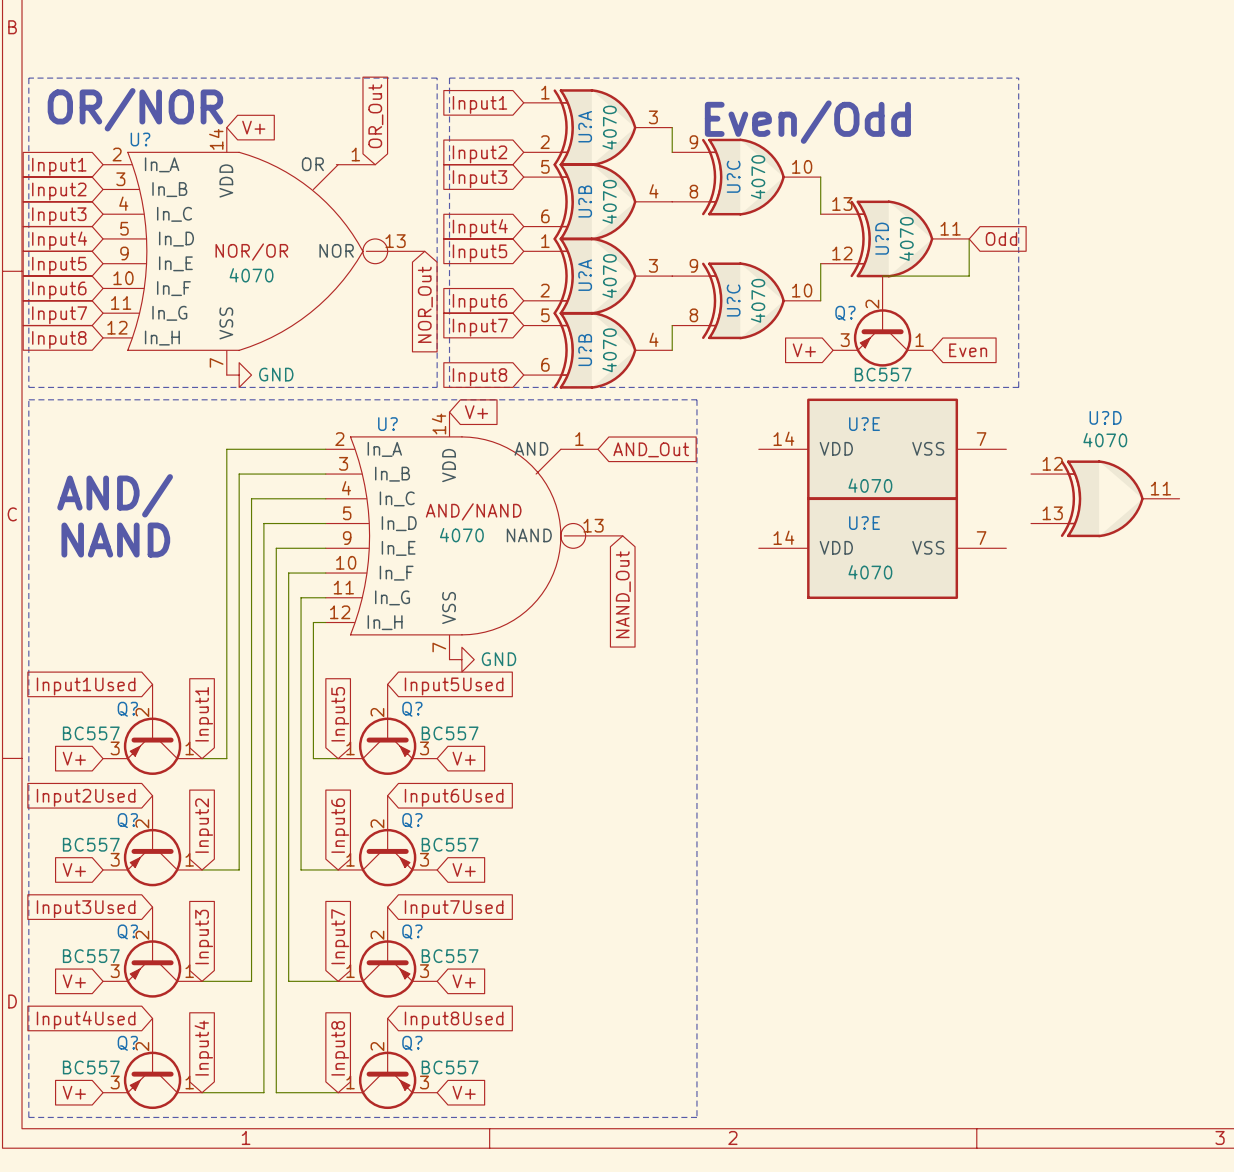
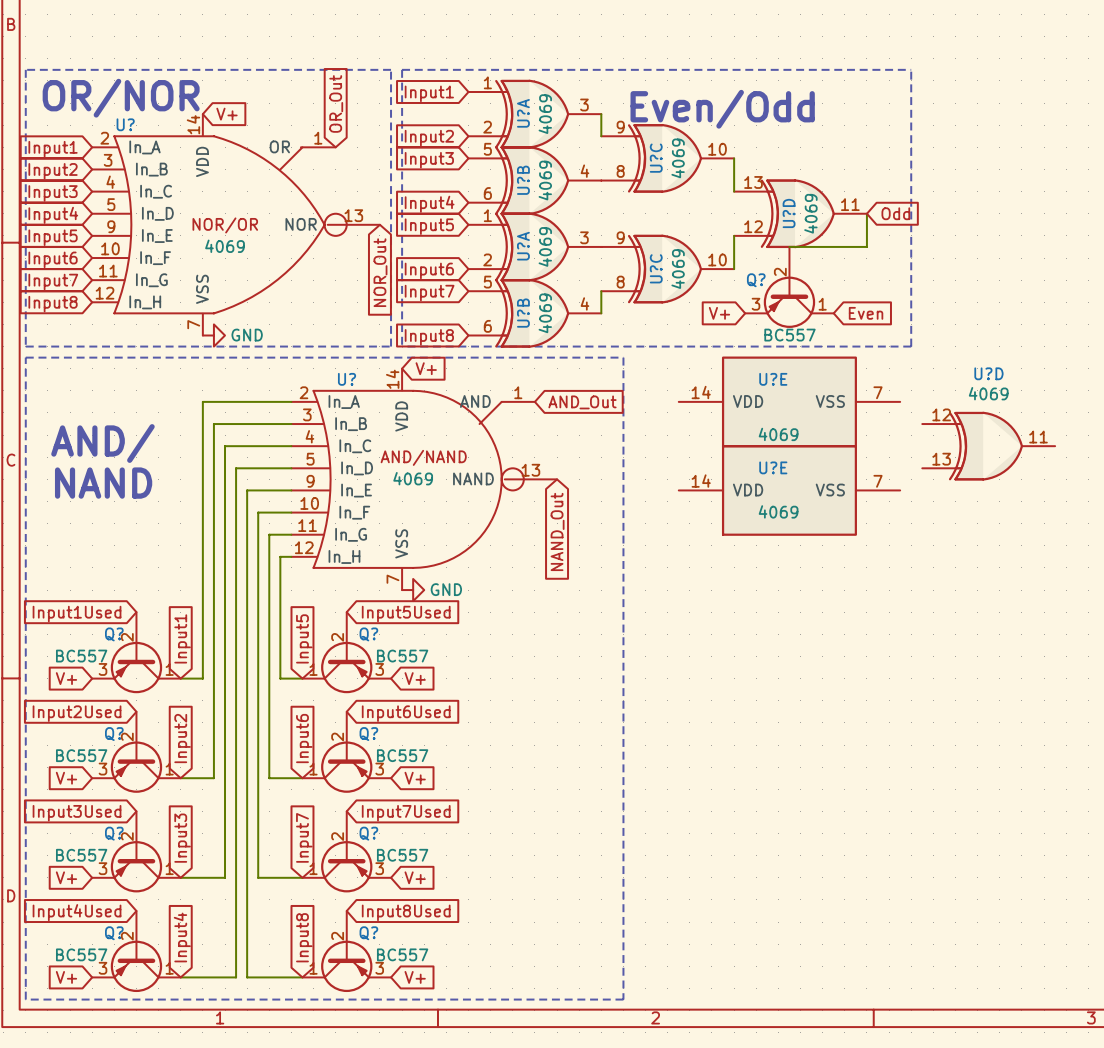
U?A value: 4070 (609, 127) -> 4069 (545, 114)
U?C value: 4070 (758, 177) -> 4069 (678, 158)
U?B value: 4070 (609, 201) -> 4069 (545, 180)
U?D value: 4070 (906, 238) -> 4069 (810, 213)
U? value: 4070 (251, 275) -> 4069 (225, 246)
U?A value: 4070 (609, 276) -> 4069 (545, 246)
U?C value: 4070 (758, 300) -> 4069 (678, 269)
U?B value: 4070 (609, 350) -> 4069 (545, 313)
U?D value: 4070 (1105, 440) -> 4069 (988, 393)
U?E value: 4070 (870, 485) -> 4069 (778, 434)
U? value: 4070 (461, 535) -> 4069 (413, 478)
U?E value: 4070 (870, 572) -> 4069 (778, 511)

